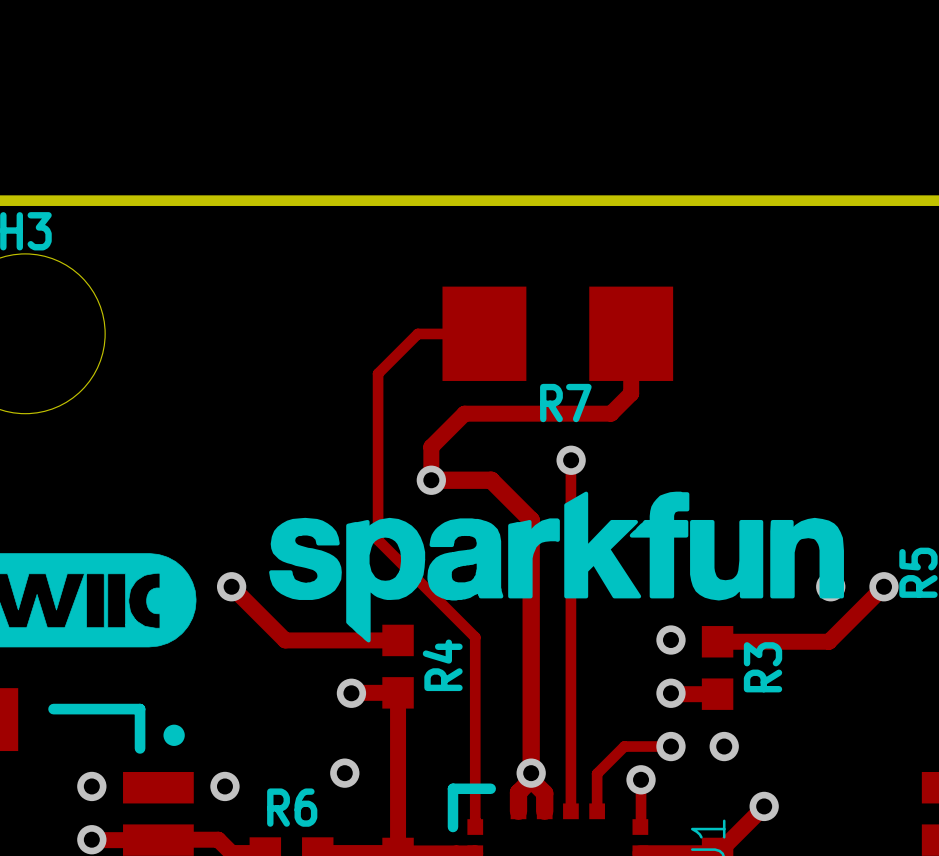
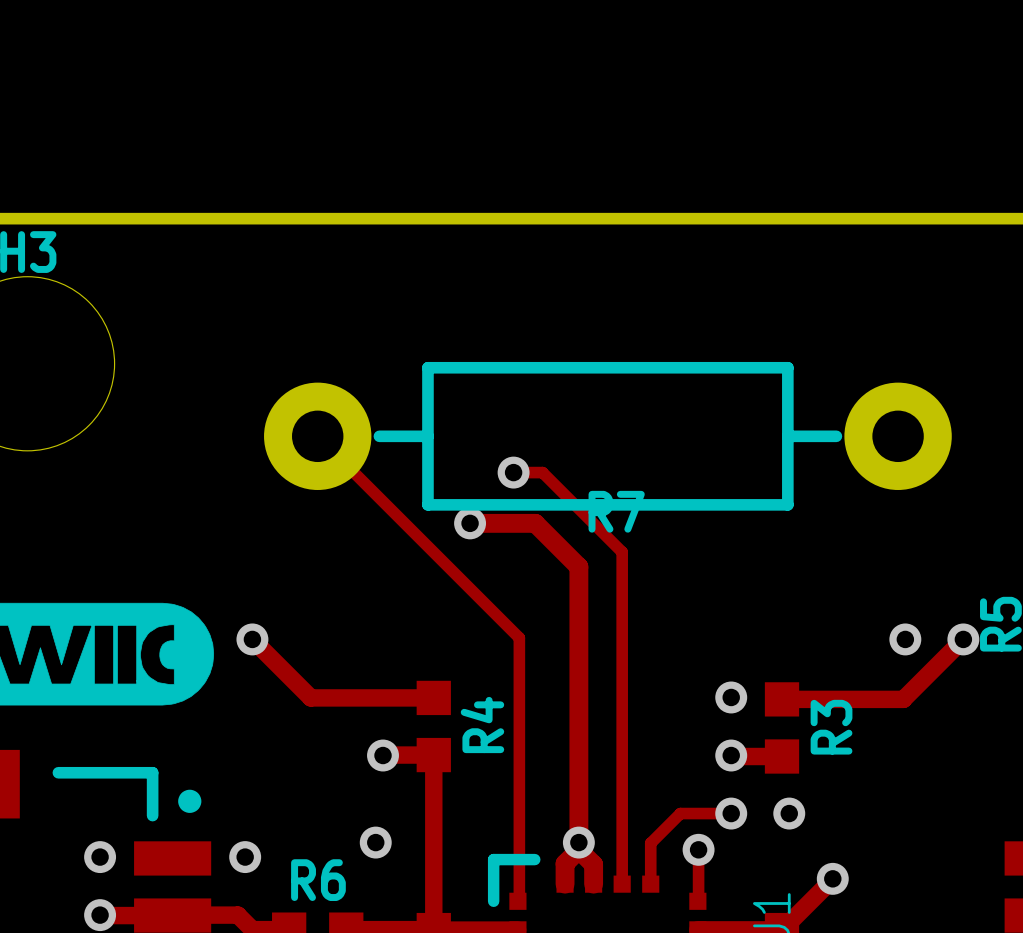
R7 footprint: [442, 286, 674, 381] -> [264, 361, 952, 511]
track: (484, 333) (417, 333) (378, 373) (378, 540) (475, 637) (475, 827) -> (317, 436) (519, 637) (519, 901)
track: (631, 333) (631, 393) (611, 413) (464, 413) (431, 446) (431, 480) -> none
track: (570, 460) (570, 506) -> (513, 472) (542, 472) (622, 552)
via position: (571, 460) -> (513, 472)
drawing: [269, 491, 844, 643] -> none

